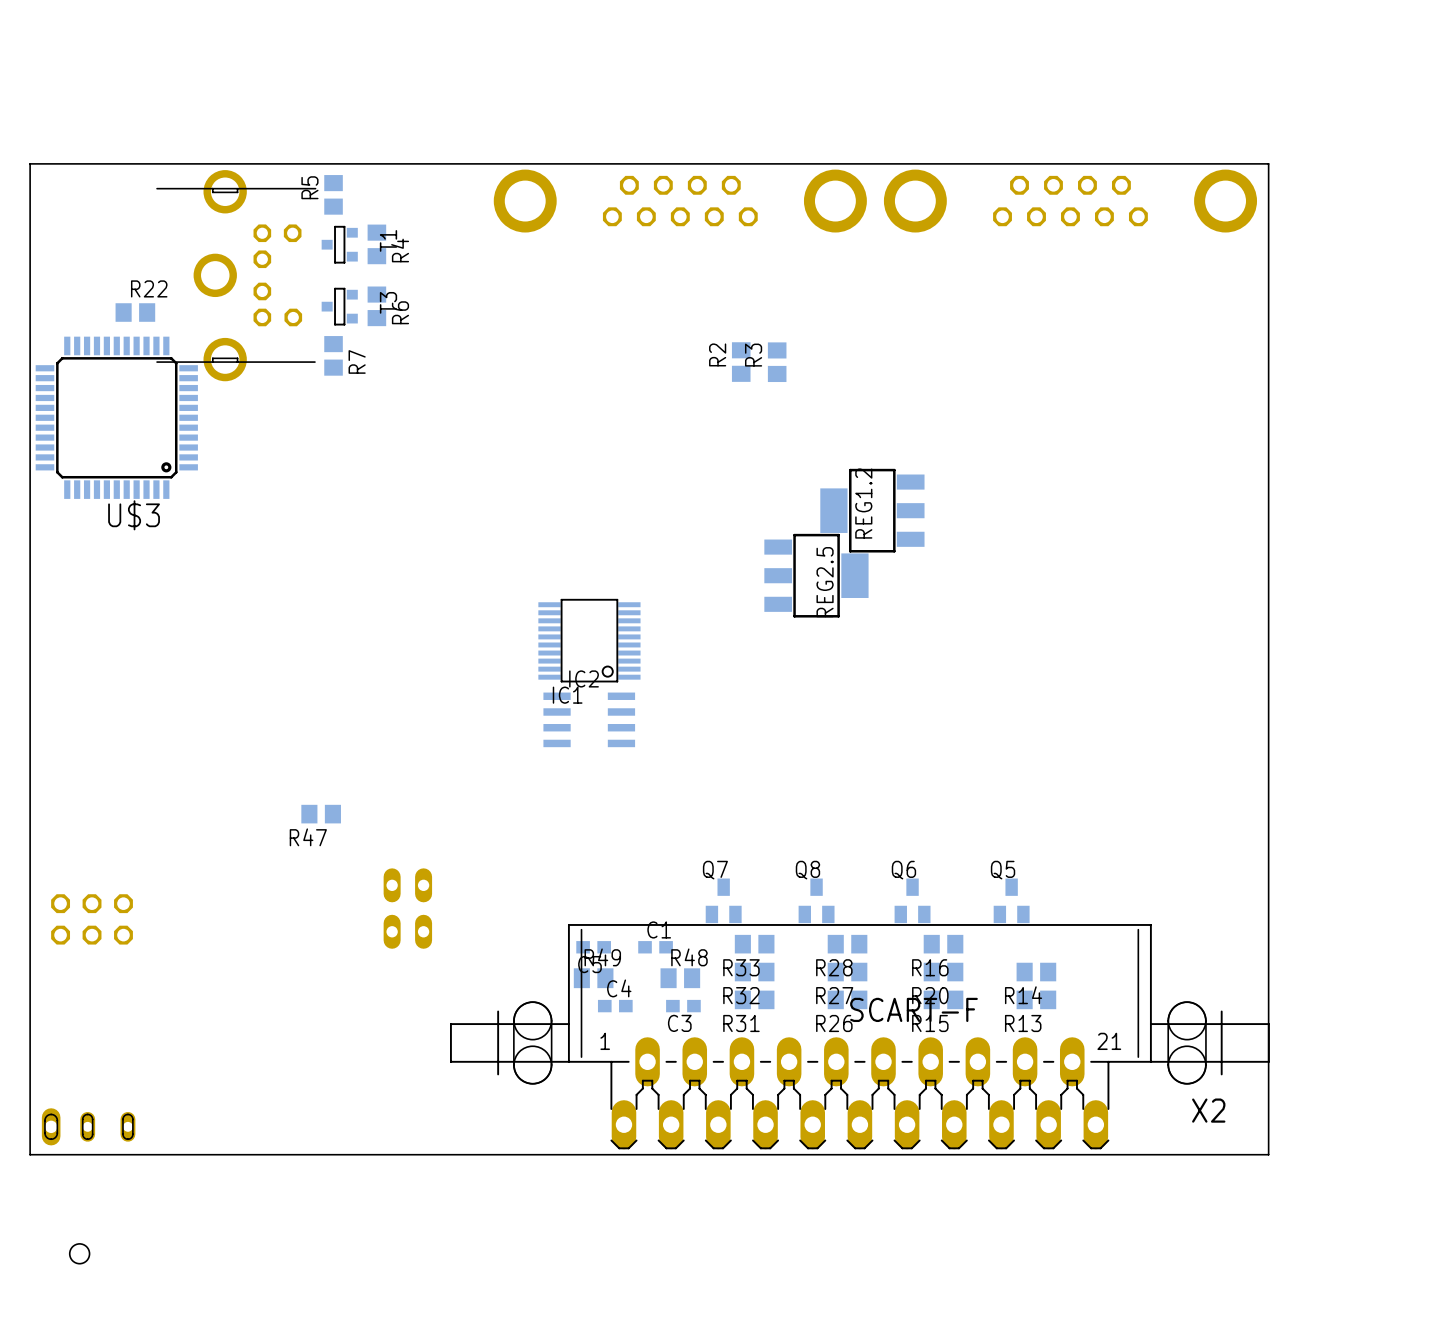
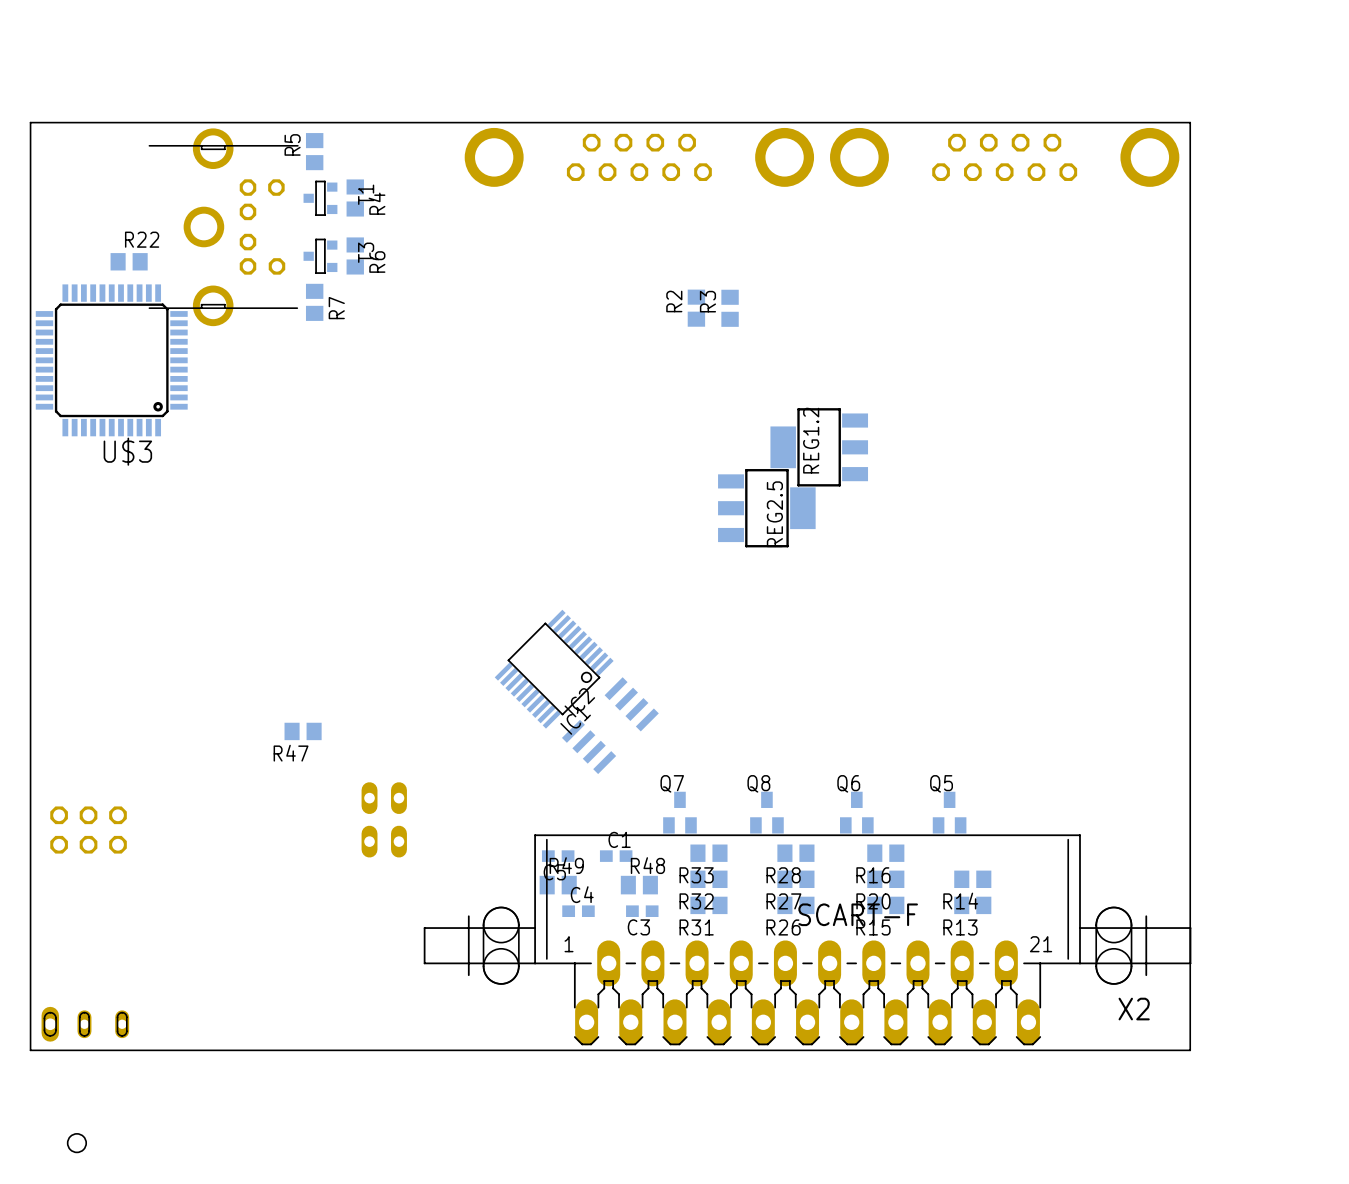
IC1 rotation: 0° (589, 640) -> 45° counterclockwise (554, 669)
IC1 position: (589, 640) -> (554, 669)
IC2 rotation: 0° (589, 719) -> 45° counterclockwise (610, 725)
IC2 position: (589, 719) -> (610, 725)

